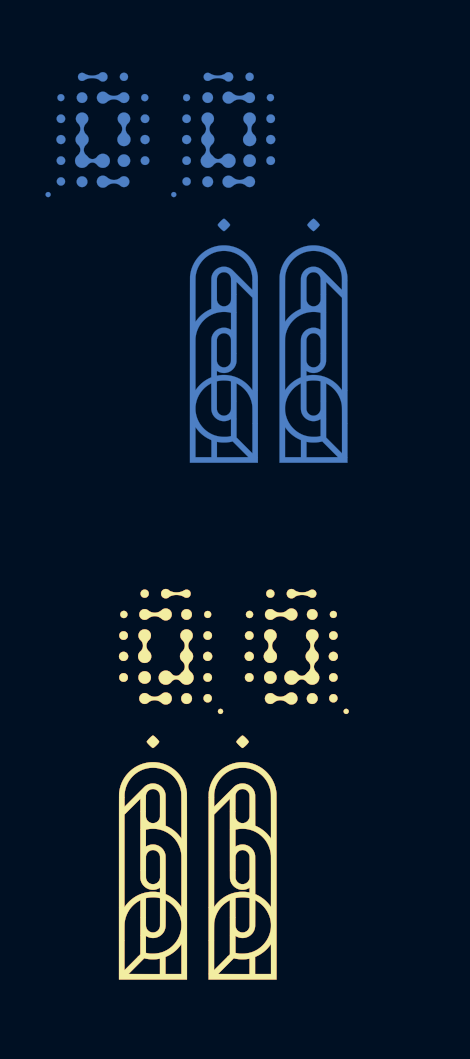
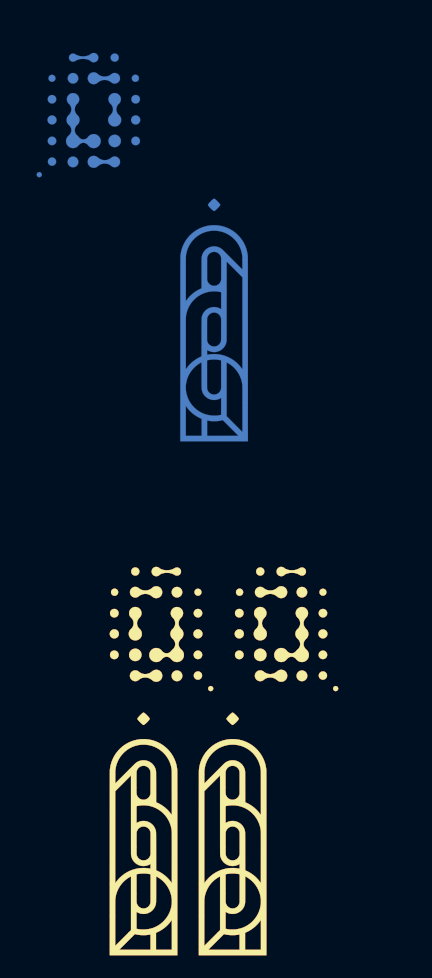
drawing: [171, 72, 348, 463] -> none

